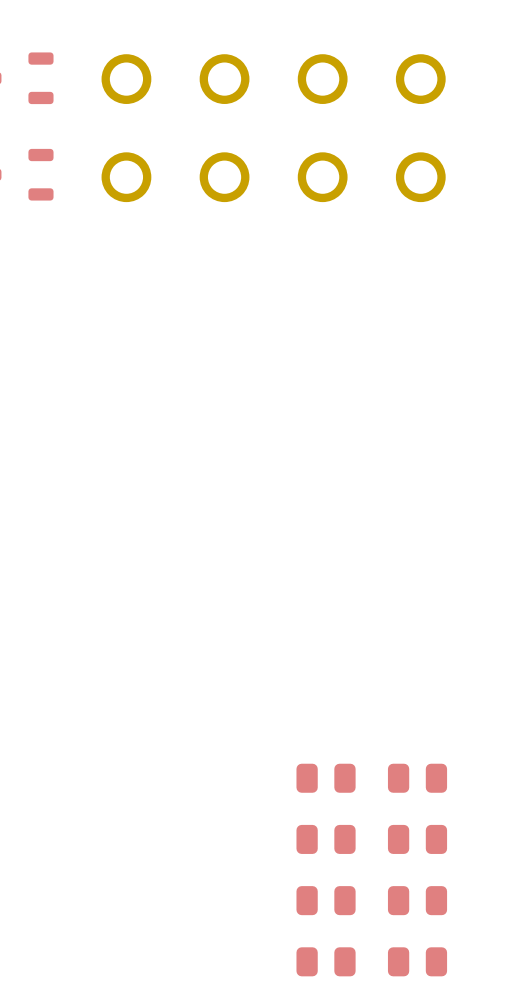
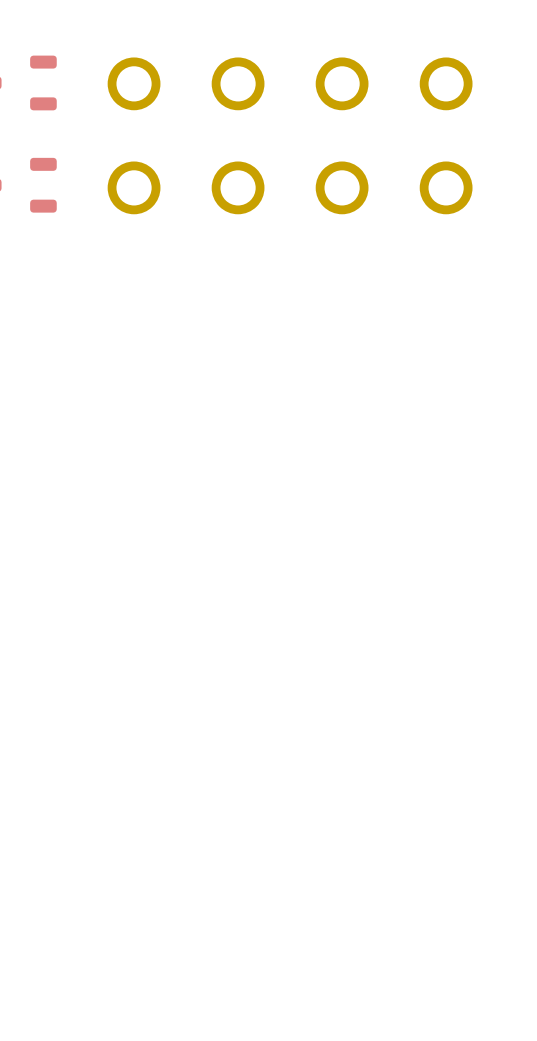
part: (326, 778) -> none
part: (417, 778) -> none
part: (326, 839) -> none
part: (417, 839) -> none
part: (326, 900) -> none
part: (417, 900) -> none
part: (326, 961) -> none
part: (417, 961) -> none

